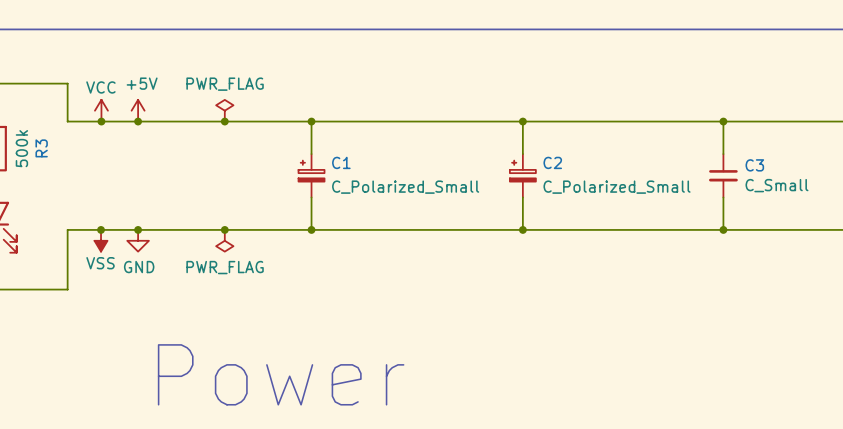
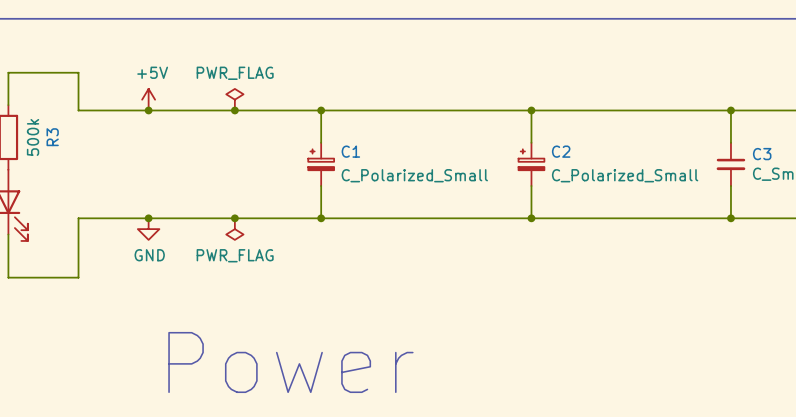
power symbol: VCC (101, 110) -> none
junction: (101, 121) -> none
junction: (101, 229) -> none
power symbol: VSS (101, 240) -> none

